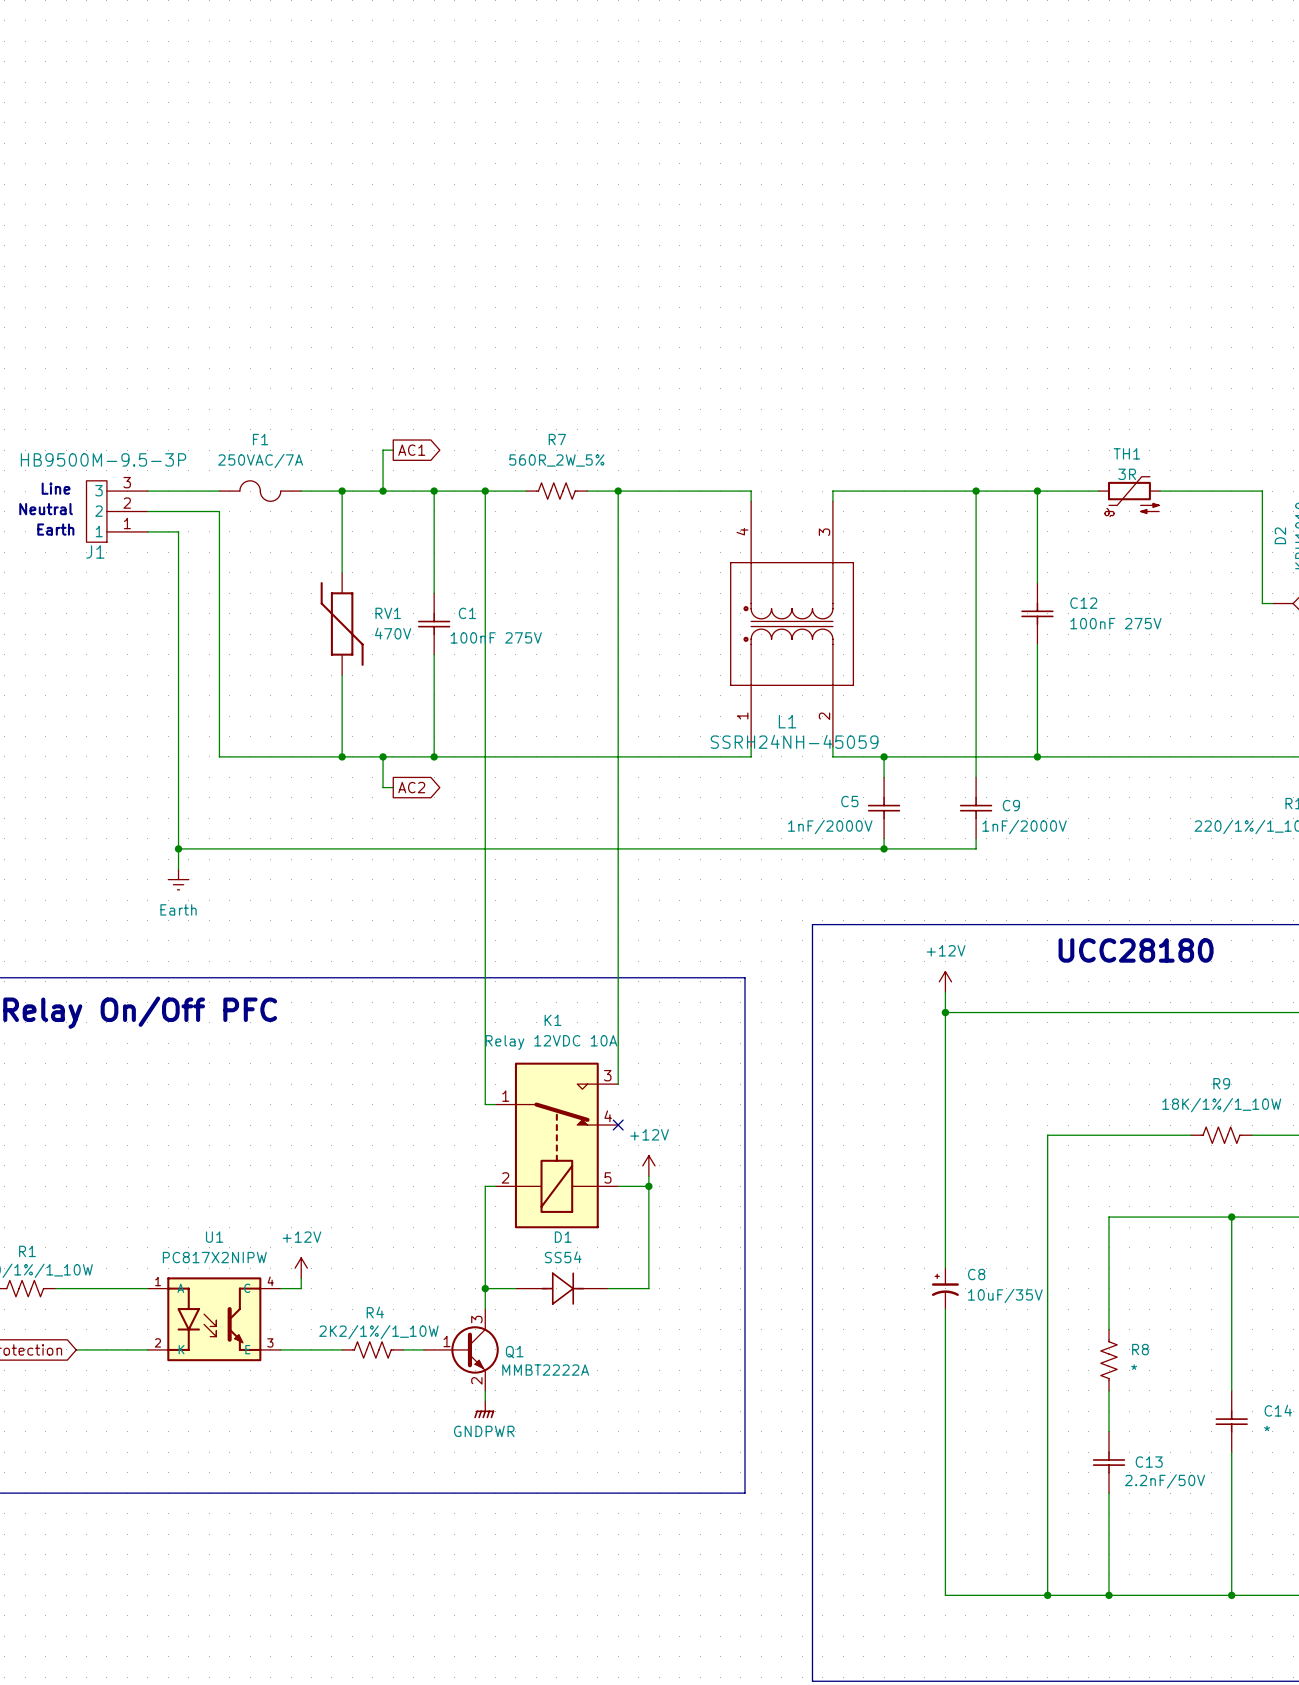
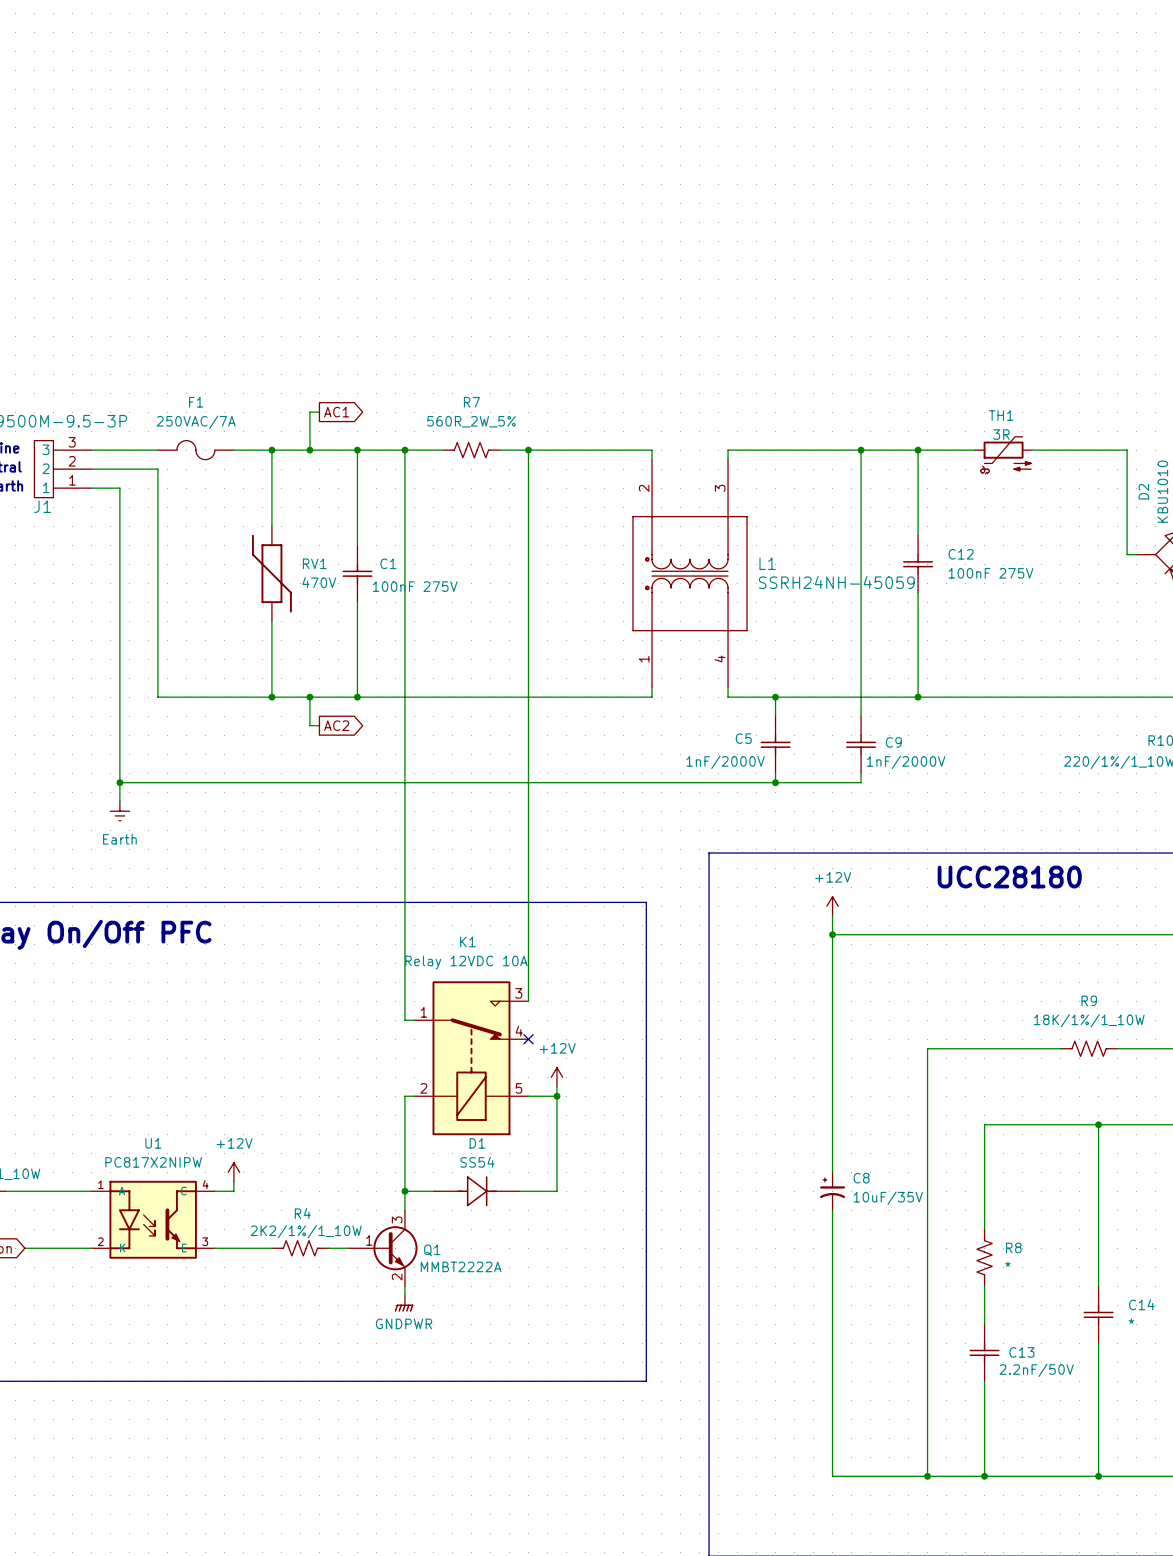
L1 pin number: 4 (742, 531) -> 2 (644, 488)
L1 pin number: 2 (824, 716) -> 4 (719, 658)
L1 name position: L1 (787, 721) -> L1 (767, 563)
L1 value position: SSRH24NH-45059 (794, 741) -> SSRH24NH-45059 (836, 582)

